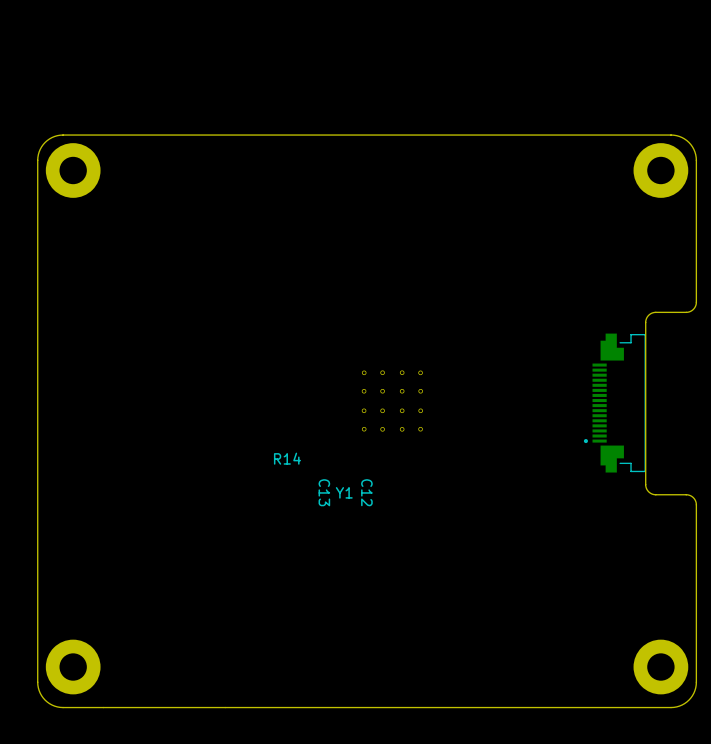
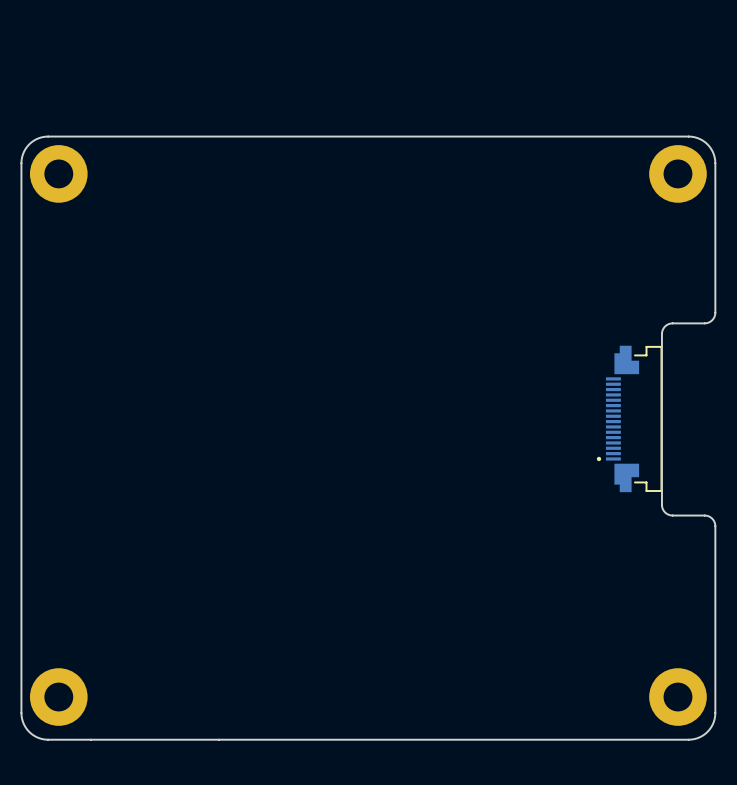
part: (392, 401) -> none
R14: (287, 458) -> none
C13: (324, 492) -> none
Y1: (344, 492) -> none
C12: (366, 492) -> none

